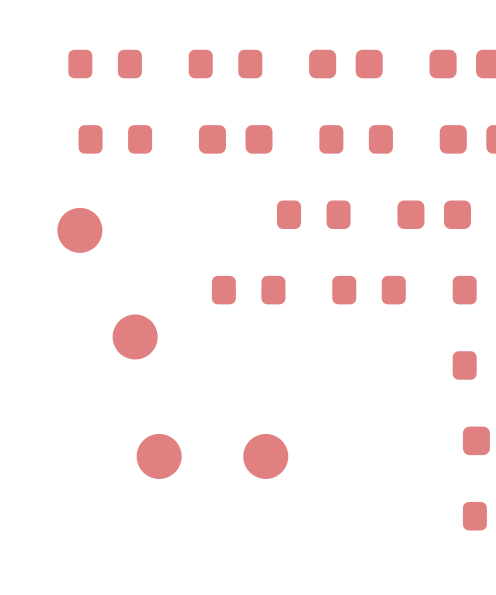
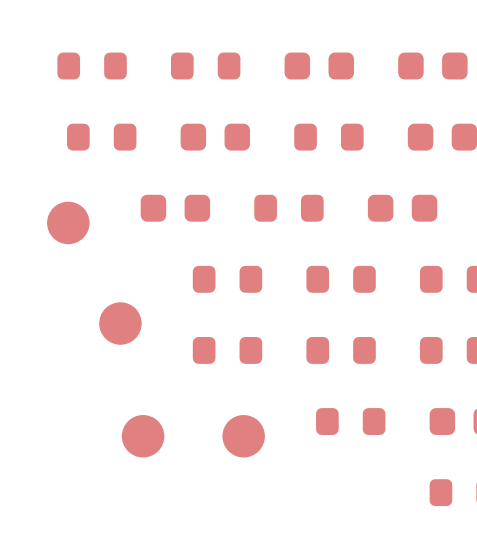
part: none -> (175, 208)
part: none -> (227, 350)
part: none -> (341, 350)
part: none -> (350, 421)

